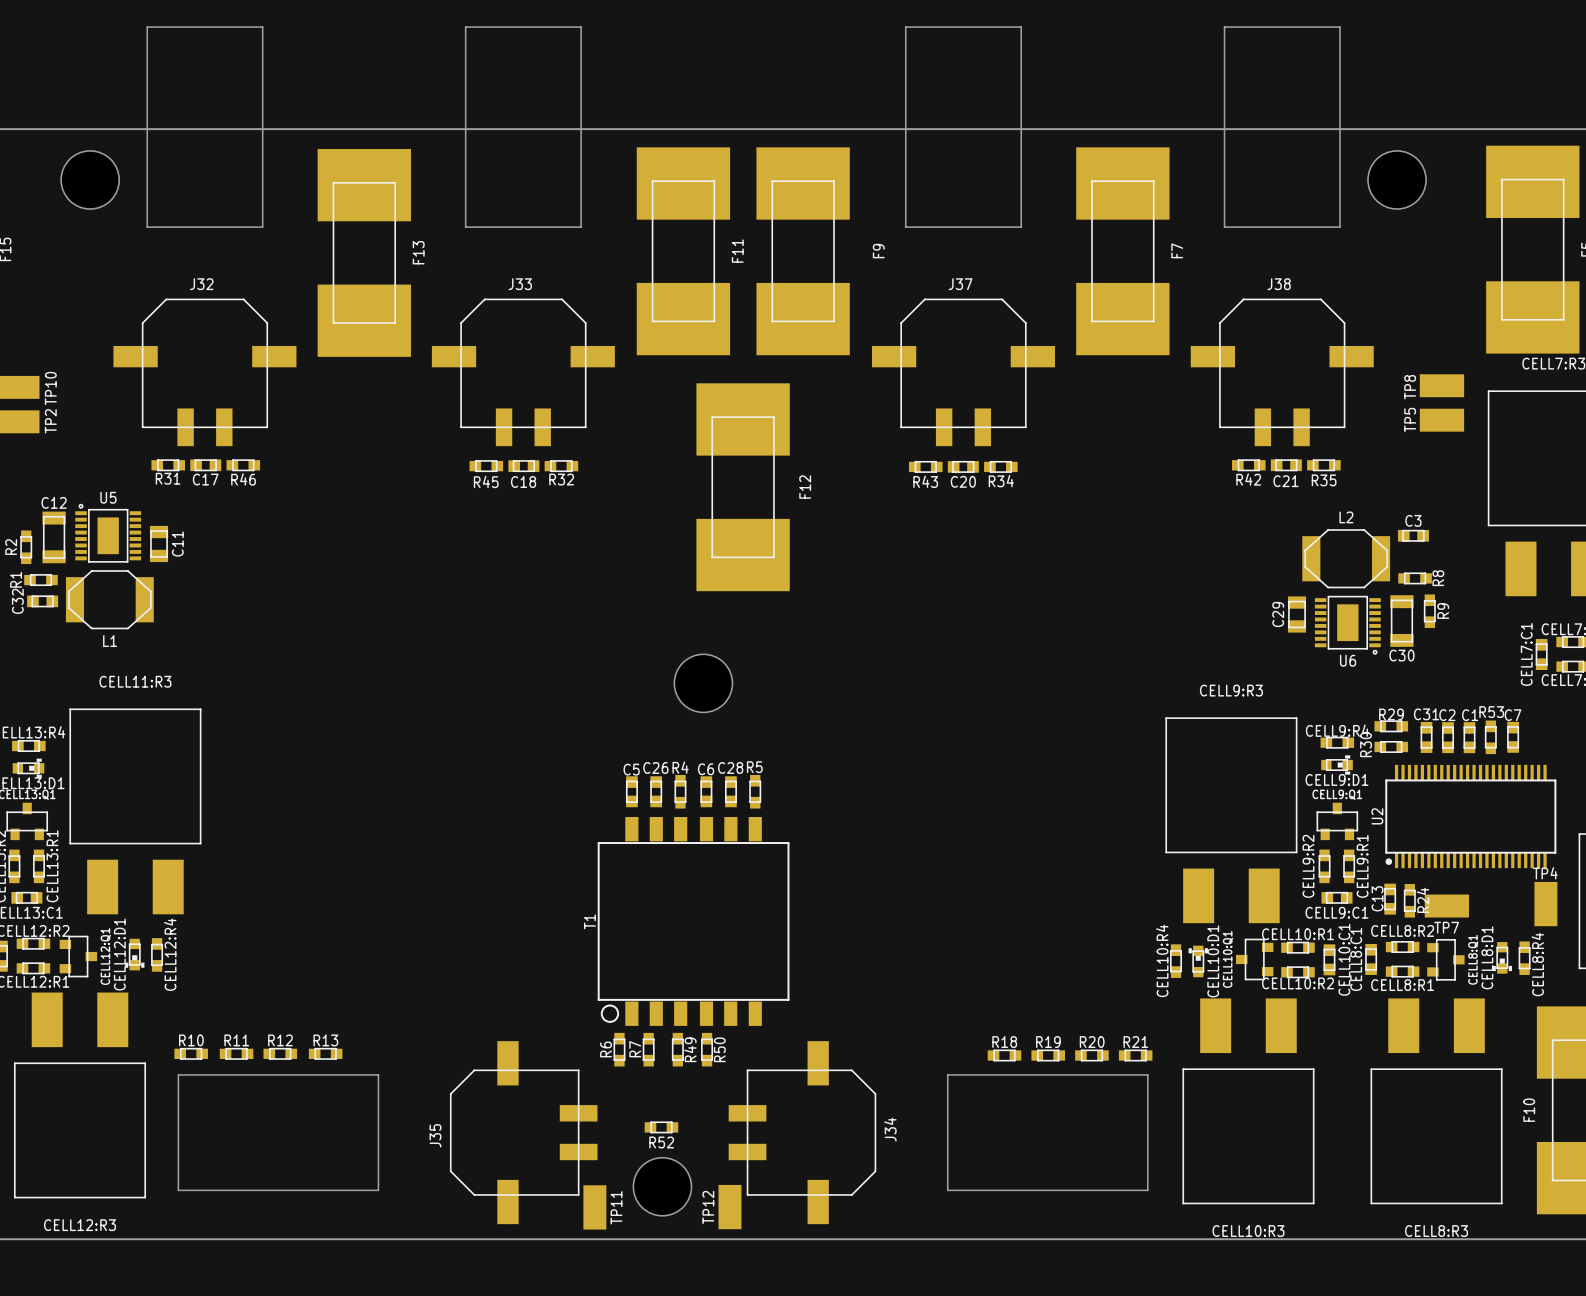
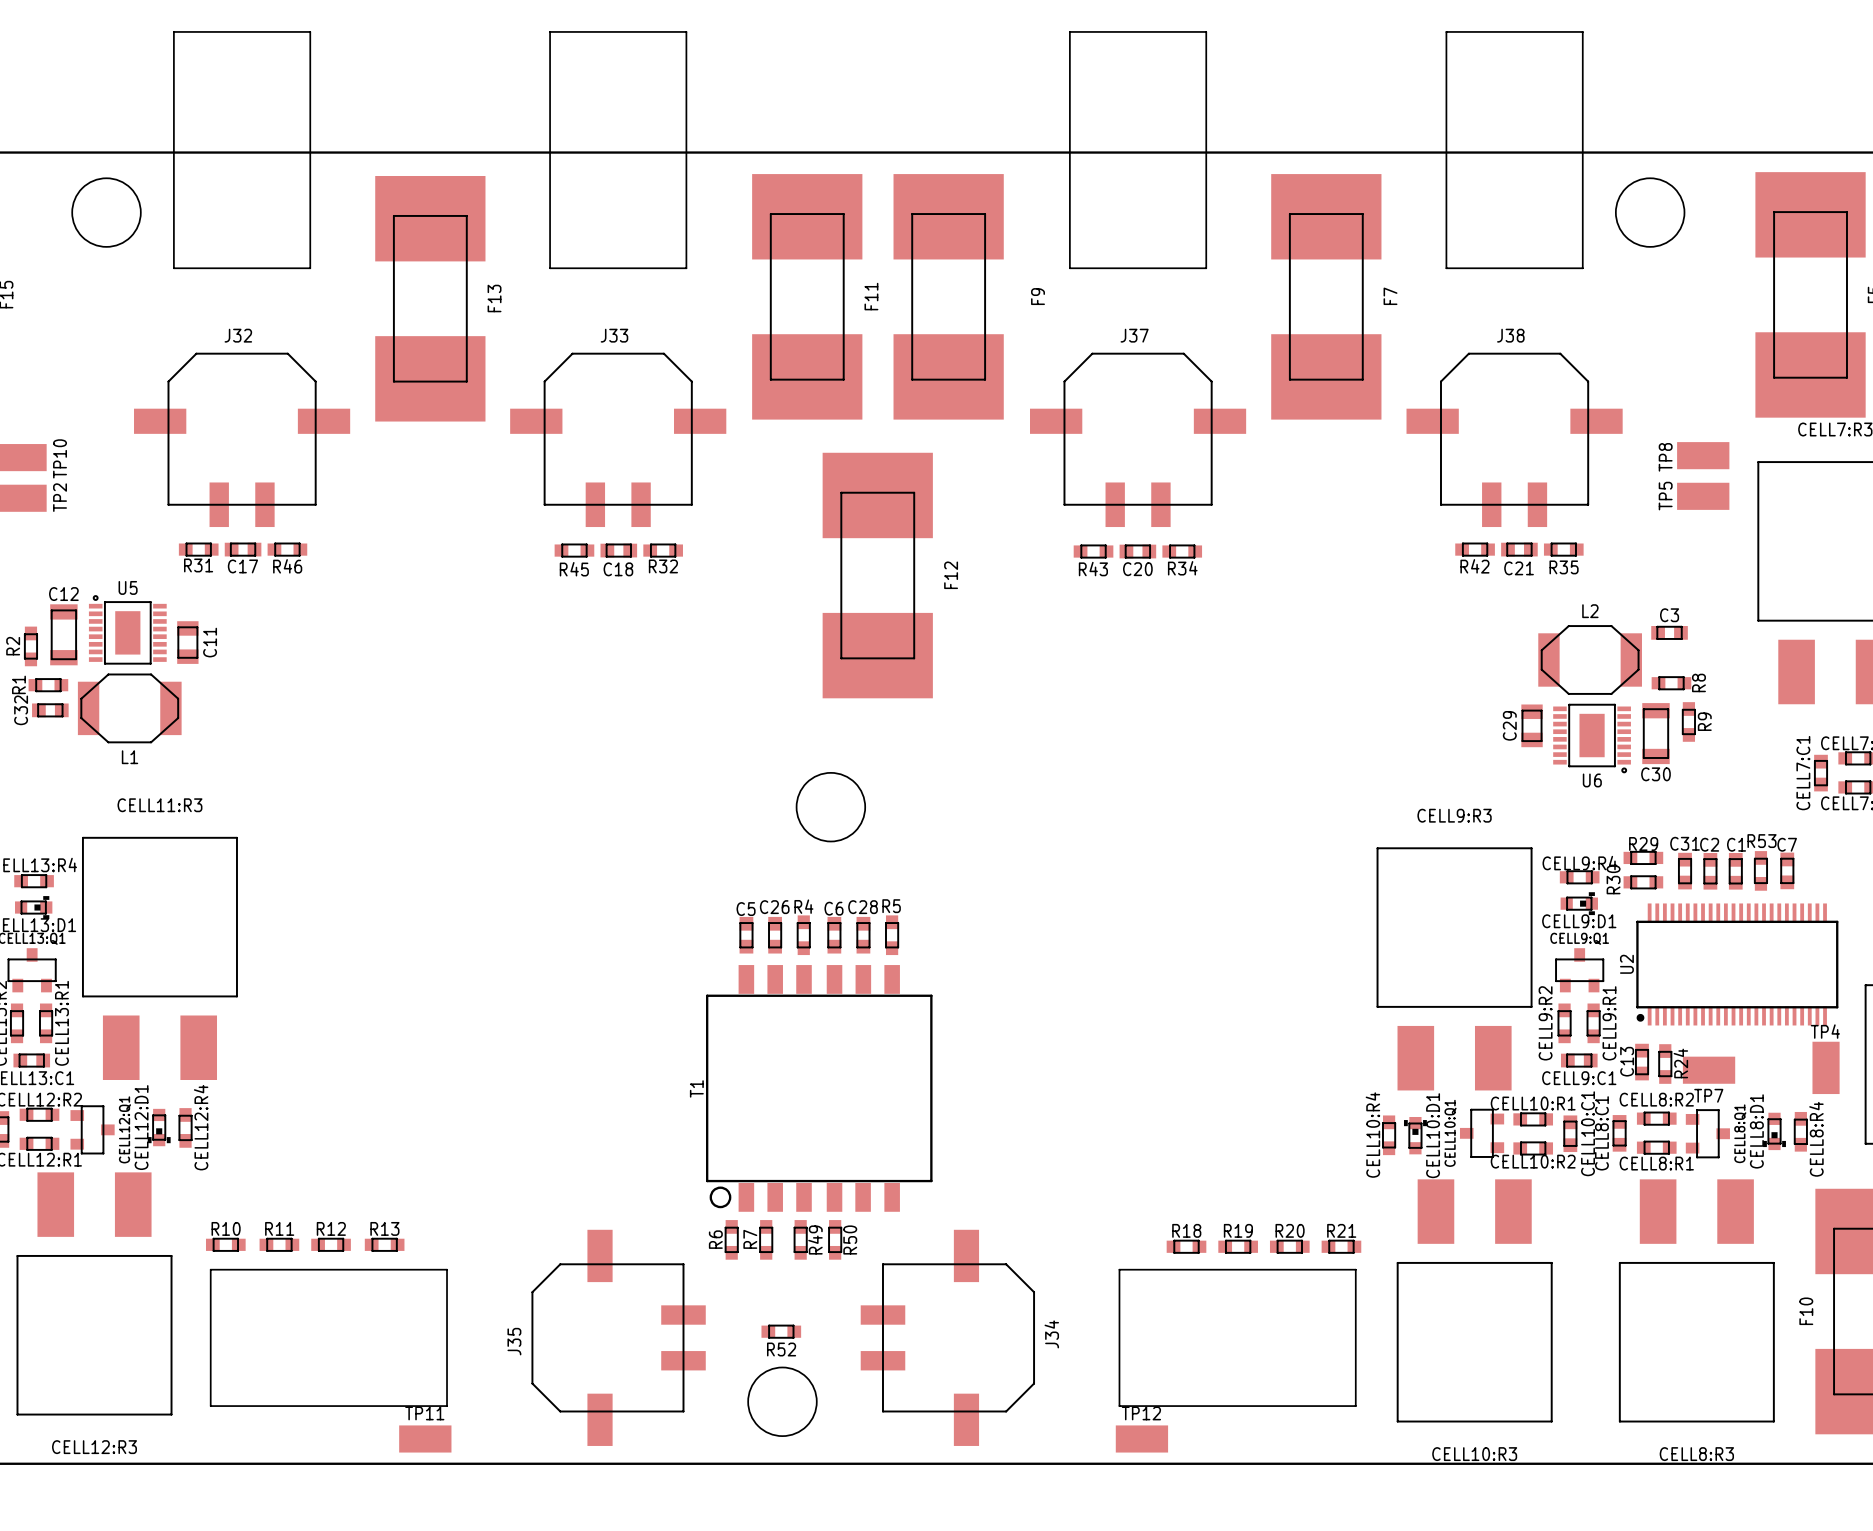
TP11 rotation: 0° (594, 1207) -> 90° clockwise (425, 1438)
TP11 position: (594, 1207) -> (425, 1438)
TP11 name position: TP11 (616, 1207) -> TP11 (424, 1413)
TP12 rotation: 0° (729, 1207) -> 90° clockwise (1141, 1438)
TP12 position: (729, 1207) -> (1141, 1438)

